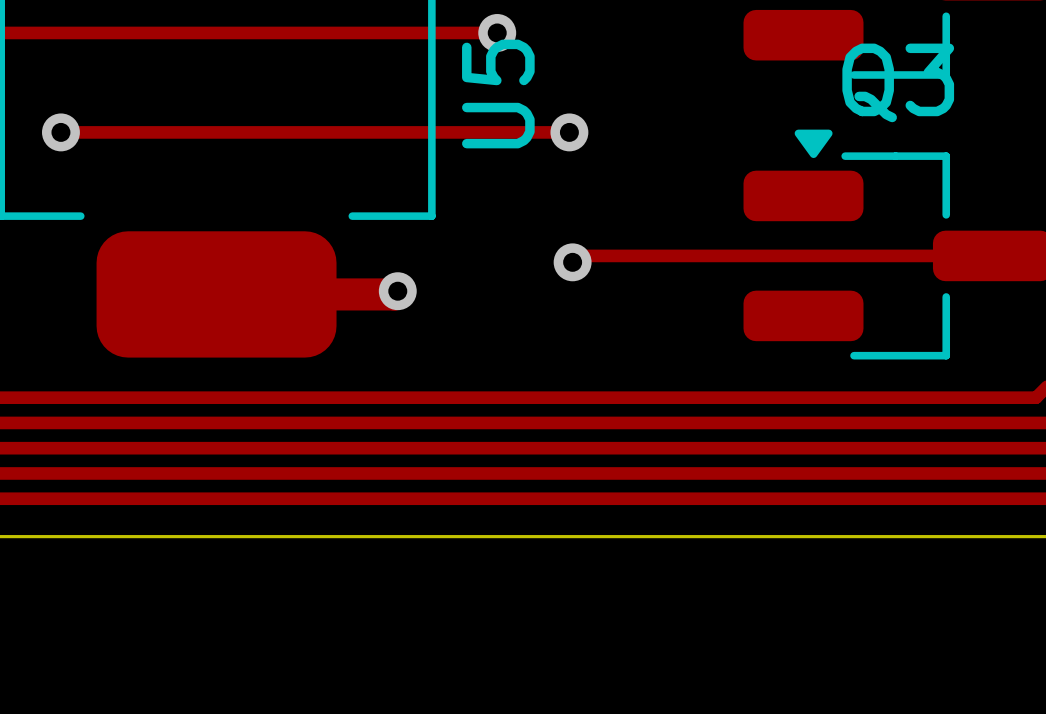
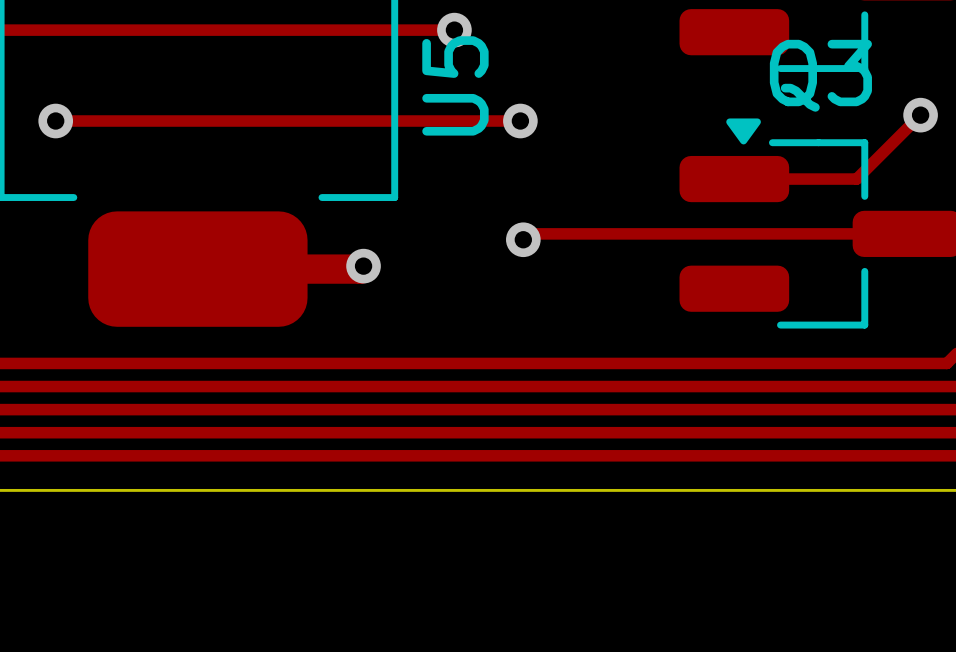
track: none -> (920, 115) (856, 179) (734, 179)
via: none -> (920, 115)

